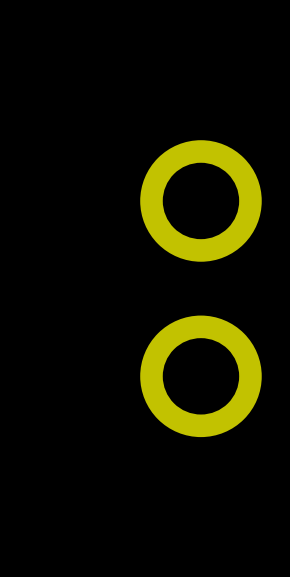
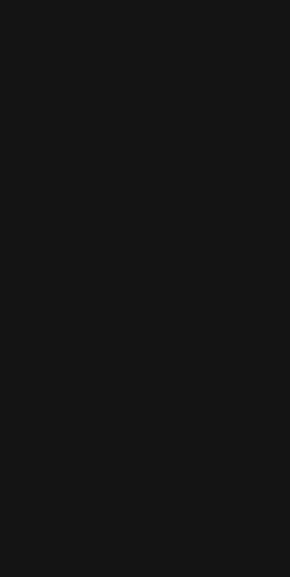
part: (200, 200) -> none
part: (200, 376) -> none

